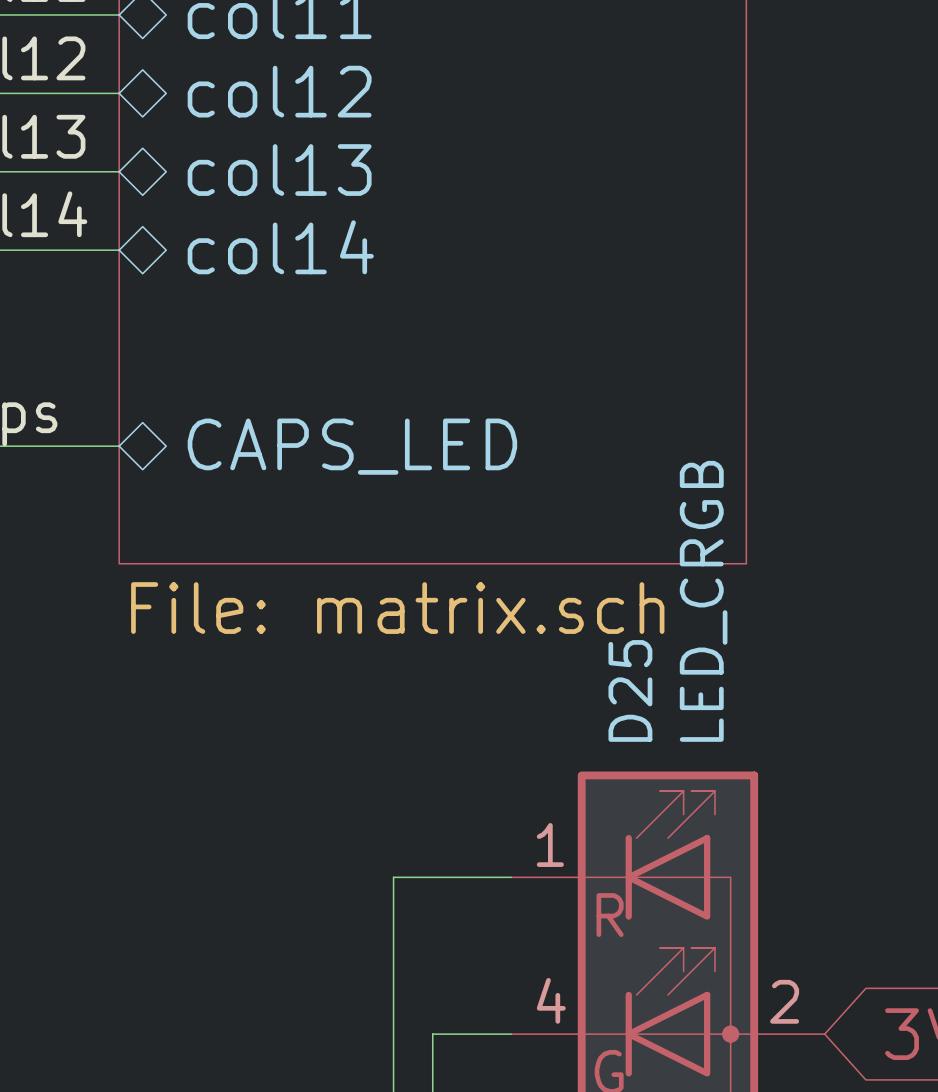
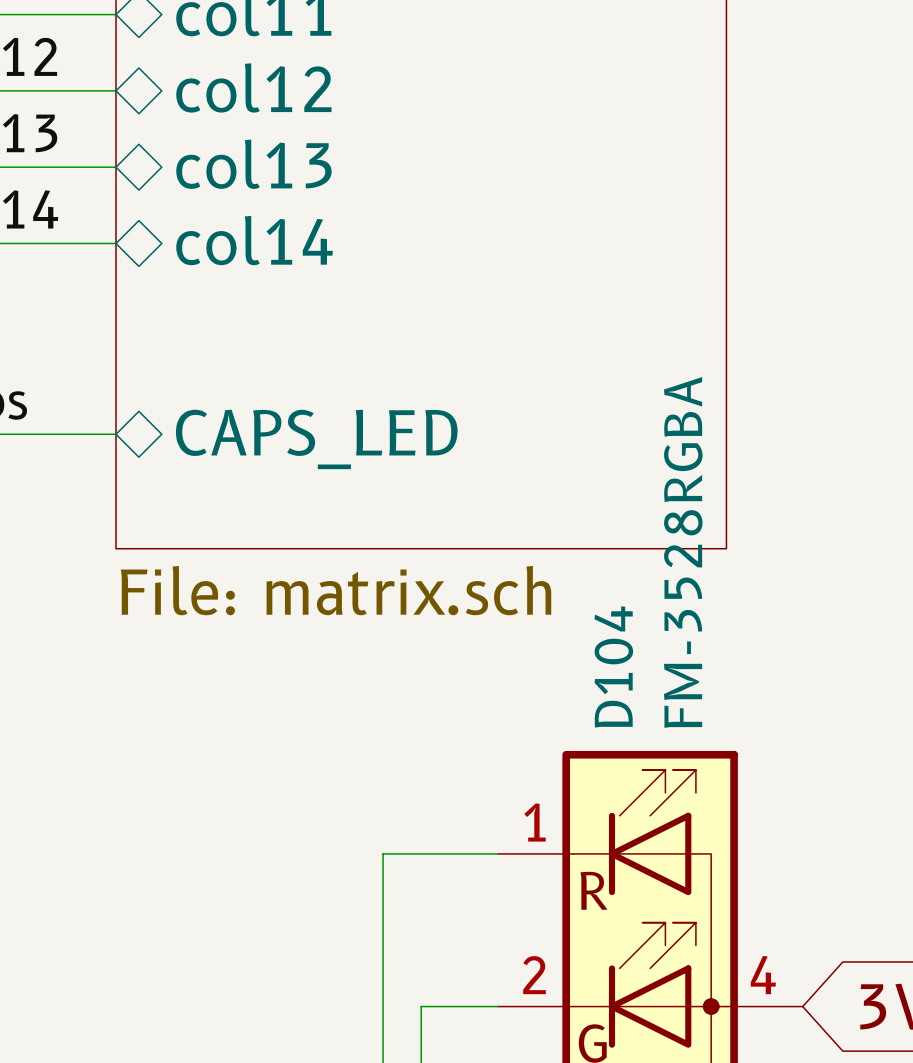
D25 value: LED_CRGB (703, 601) -> FM-3528RGBA (683, 552)
D25 name: D25 (630, 690) -> D104 (613, 666)
D25 pin number: 4 (551, 1000) -> 2 (534, 975)
D25 pin number: 2 (784, 1001) -> 4 (763, 975)

